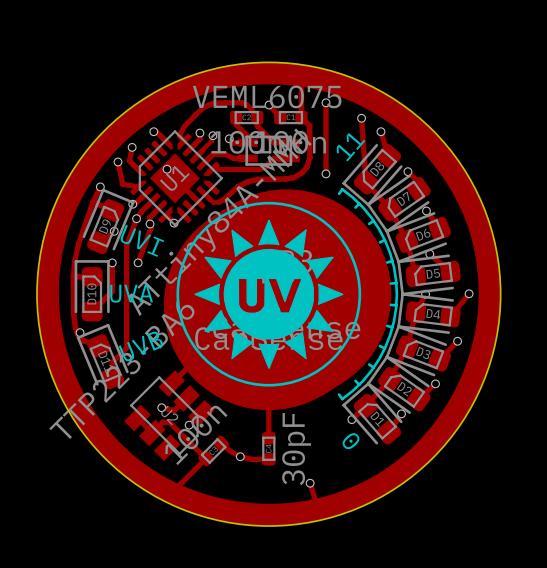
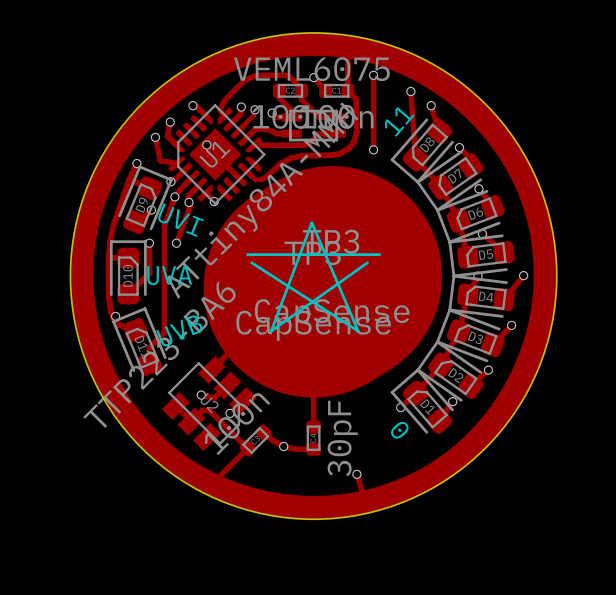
line: (339, 193) (342, 189) (353, 197) (379, 229) (390, 253) (396, 294) (390, 334) (379, 359) (353, 390) (342, 399) (339, 394) -> none
drawing: [176, 201, 362, 387] -> none
line: (359, 203) (355, 207) -> none
line: (373, 220) (369, 223) -> none
line: (384, 240) (379, 242) -> none
line: (392, 261) (387, 262) -> none
line: none -> (247, 254) (379, 254)
line: none -> (251, 262) (358, 331) (311, 222) (271, 331) (367, 262)
line: (396, 283) (390, 283) -> none
line: (390, 304) (396, 305) -> none
line: (387, 325) (392, 327) -> none
line: (379, 346) (384, 348) -> none
line: (369, 364) (373, 367) -> none
line: (355, 380) (359, 384) -> none

